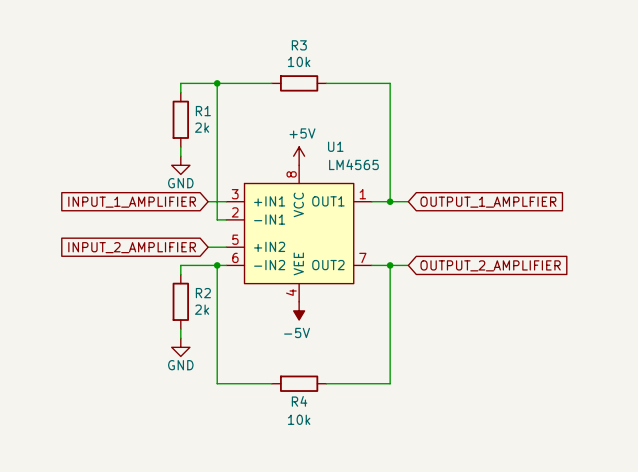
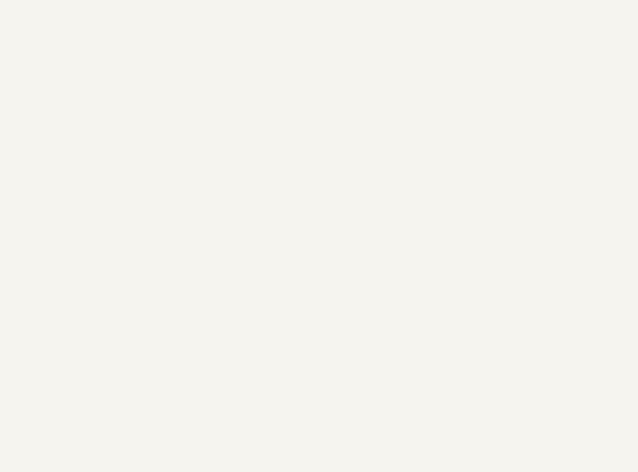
wire: (217, 83) (217, 219) (226, 219) -> none
junction: (217, 83) -> none
wire: (271, 83) (180, 83) (180, 92) -> none
R3: 10k (299, 83) -> none
wire: (326, 83) (390, 83) (390, 201) -> none
R1: 2k (180, 119) -> none
wire: (180, 147) (180, 156) -> none
power symbol: +5V (299, 156) -> none
power symbol: GND (180, 165) -> none
wire: (208, 201) (226, 201) -> none
wire: (371, 201) (408, 201) -> none
junction: (390, 201) -> none
global label: INPUT_1_AMPLIFIER (132, 202) -> none
global label: OUTPUT_1_AMPLFIER (488, 202) -> none
U1: LM4565 (299, 233) -> none
global label: INPUT_2_AMPLIFIER (132, 247) -> none
wire: (208, 247) (226, 247) -> none
wire: (217, 265) (217, 383) (271, 383) -> none
junction: (217, 265) -> none
wire: (226, 265) (180, 265) (180, 274) -> none
wire: (371, 265) (408, 265) -> none
wire: (390, 265) (390, 383) (326, 383) -> none
junction: (390, 265) -> none
global label: OUTPUT_2_AMPLIFIER (490, 265) -> none
R2: 2k (180, 301) -> none
power symbol: -5V (299, 310) -> none
wire: (180, 329) (180, 338) -> none
power symbol: GND (180, 347) -> none
R4: 10k (299, 383) -> none

